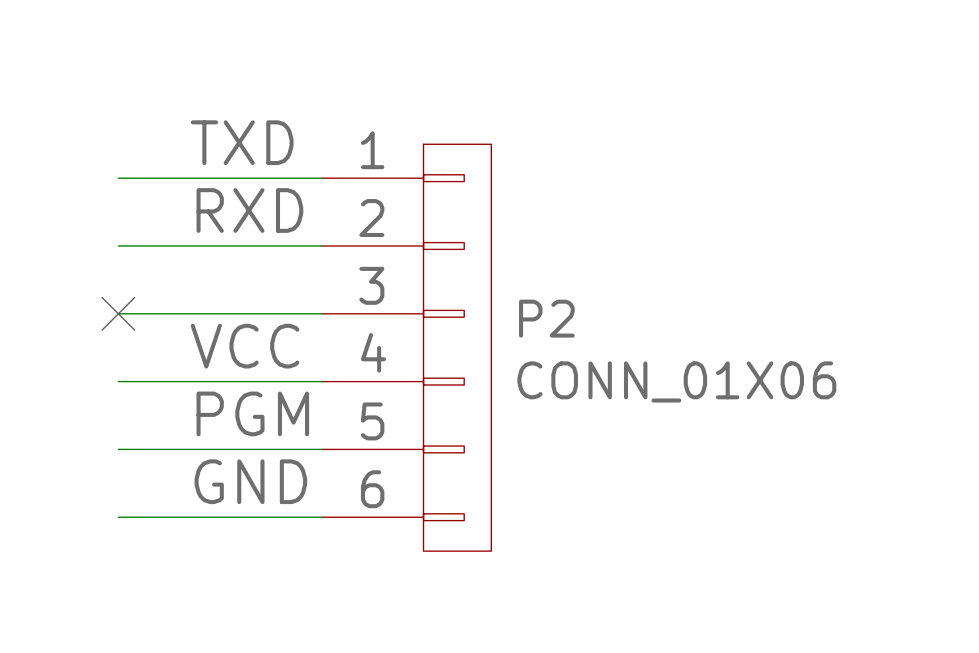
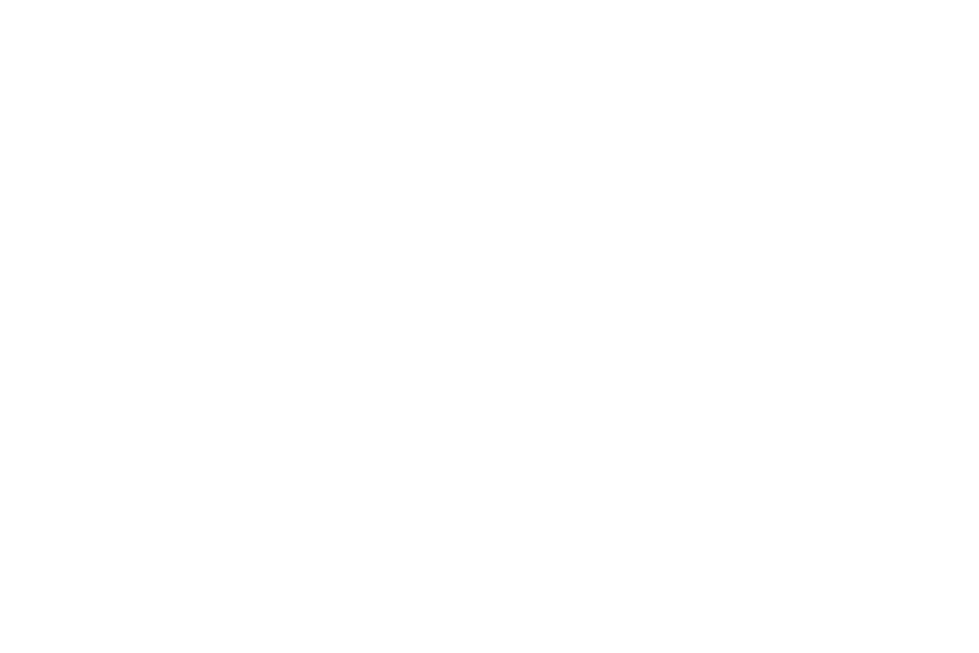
label: TXD (242, 142) -> none
wire: (118, 178) (321, 178) -> none
label: RXD (249, 210) -> none
wire: (118, 245) (321, 245) -> none
wire: (118, 313) (321, 313) -> none
no-connect mark: (118, 313) -> none
label: VCC (245, 346) -> none
P2: CONN_01X06 (406, 347) -> none
wire: (118, 381) (321, 381) -> none
label: PGM (252, 413) -> none
wire: (118, 449) (321, 449) -> none
label: GND (250, 481) -> none
wire: (118, 517) (321, 517) -> none

